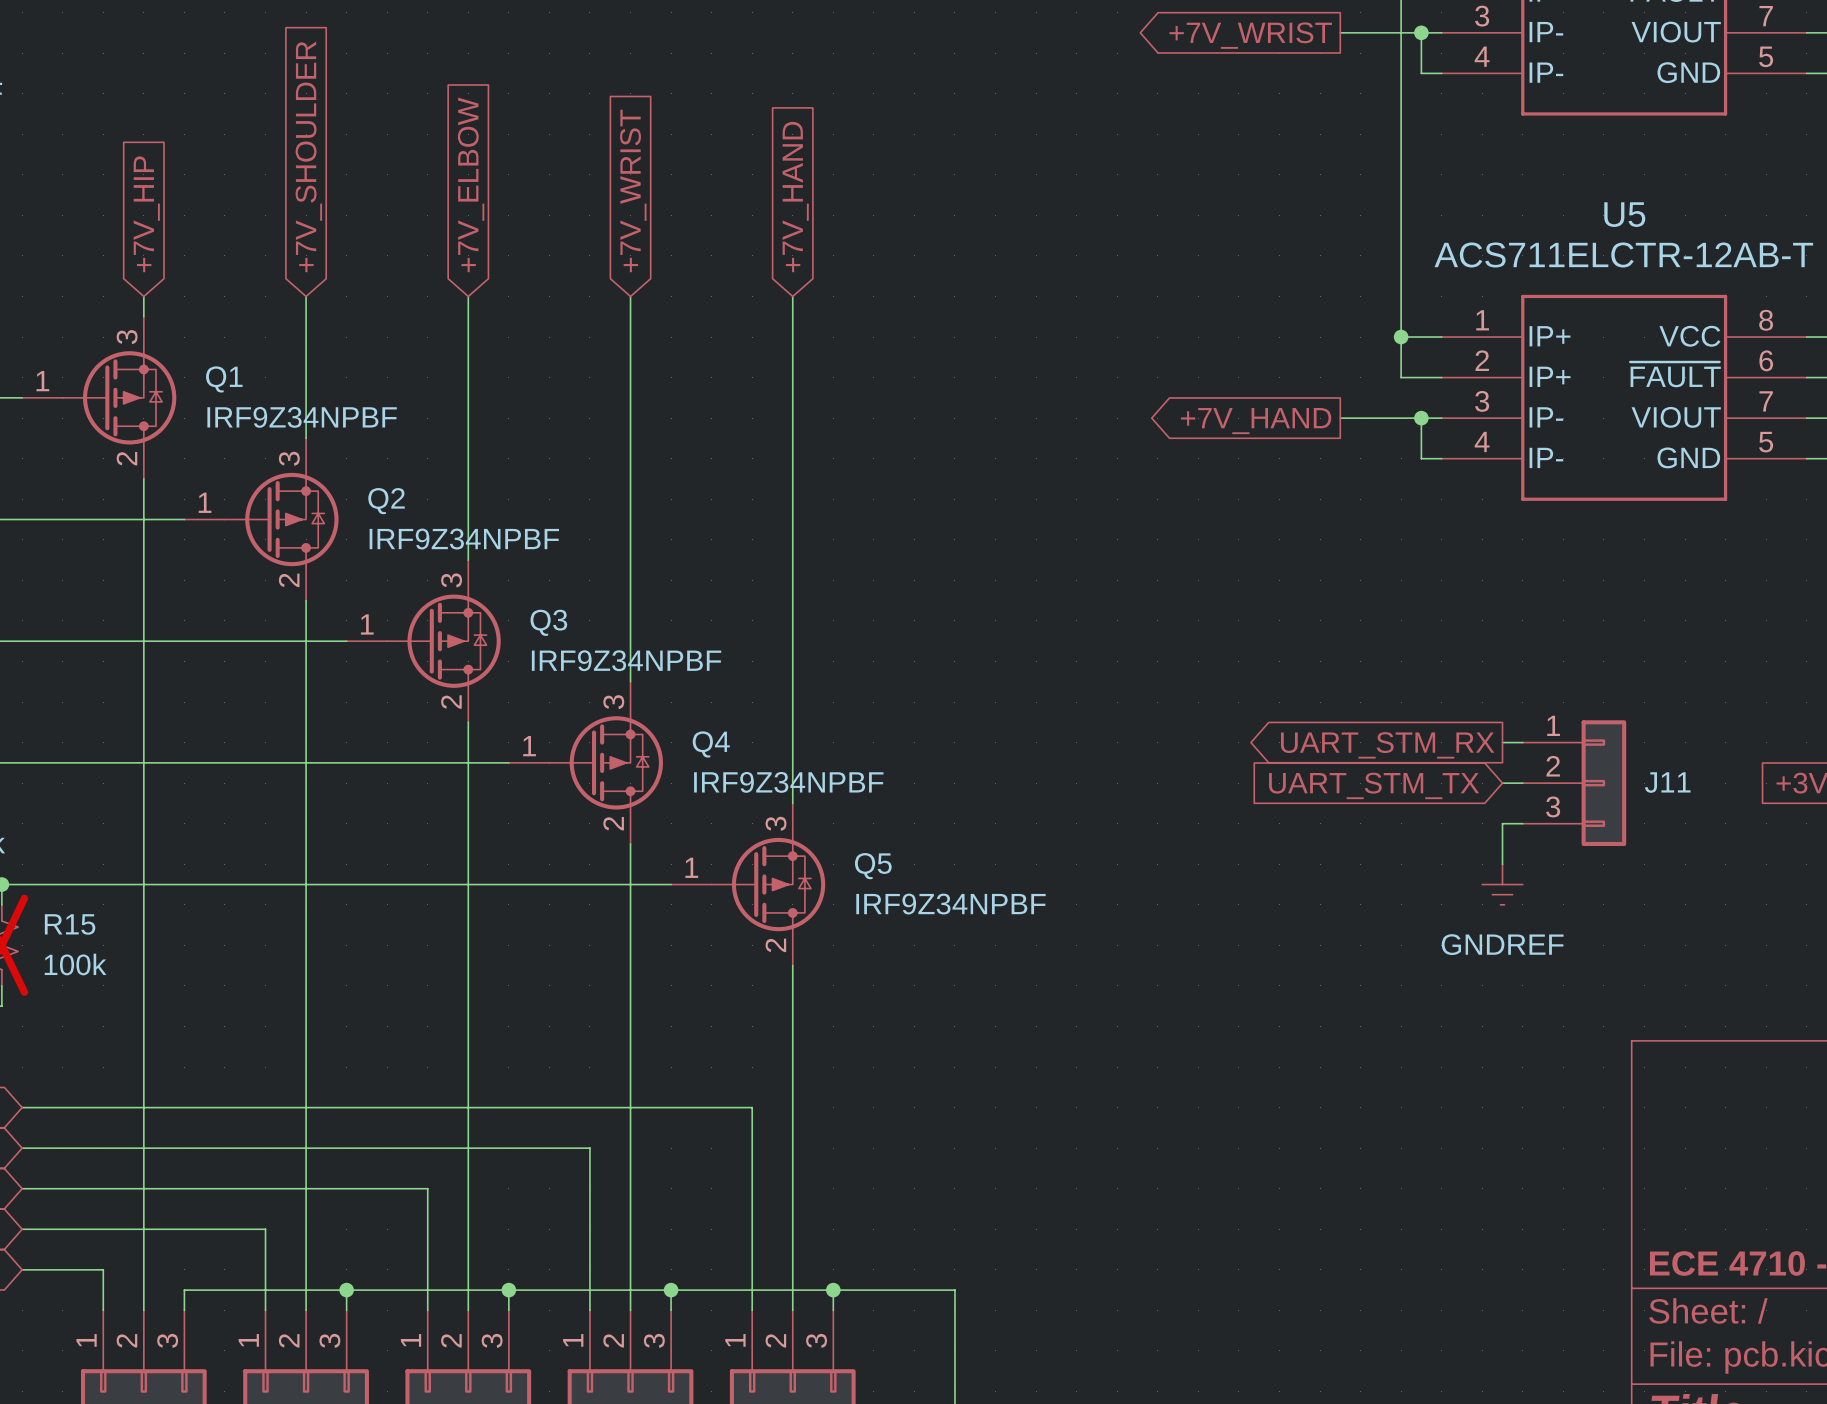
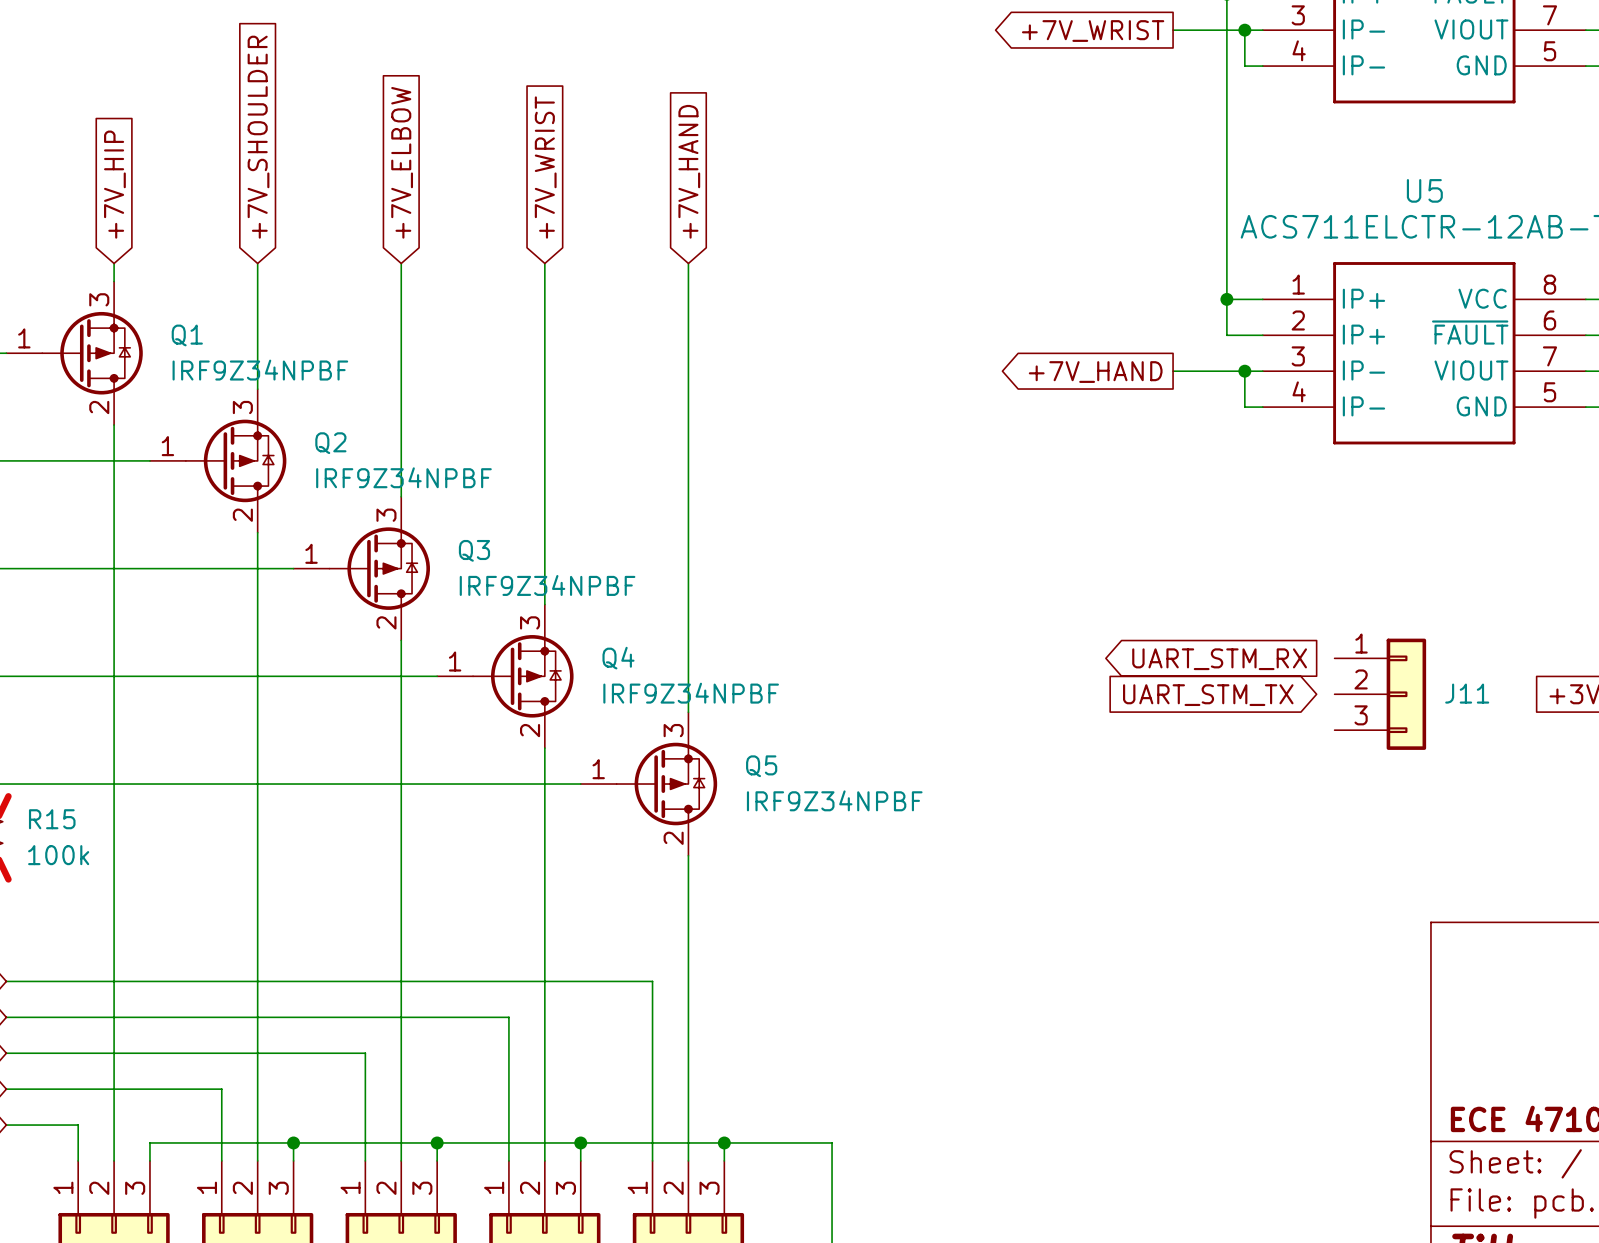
wire: (1502, 742) (1522, 742) -> none
wire: (1502, 783) (1522, 783) -> none
wire: (1522, 823) (1502, 823) (1502, 864) -> none
power symbol: GNDREF (1502, 884) -> none

